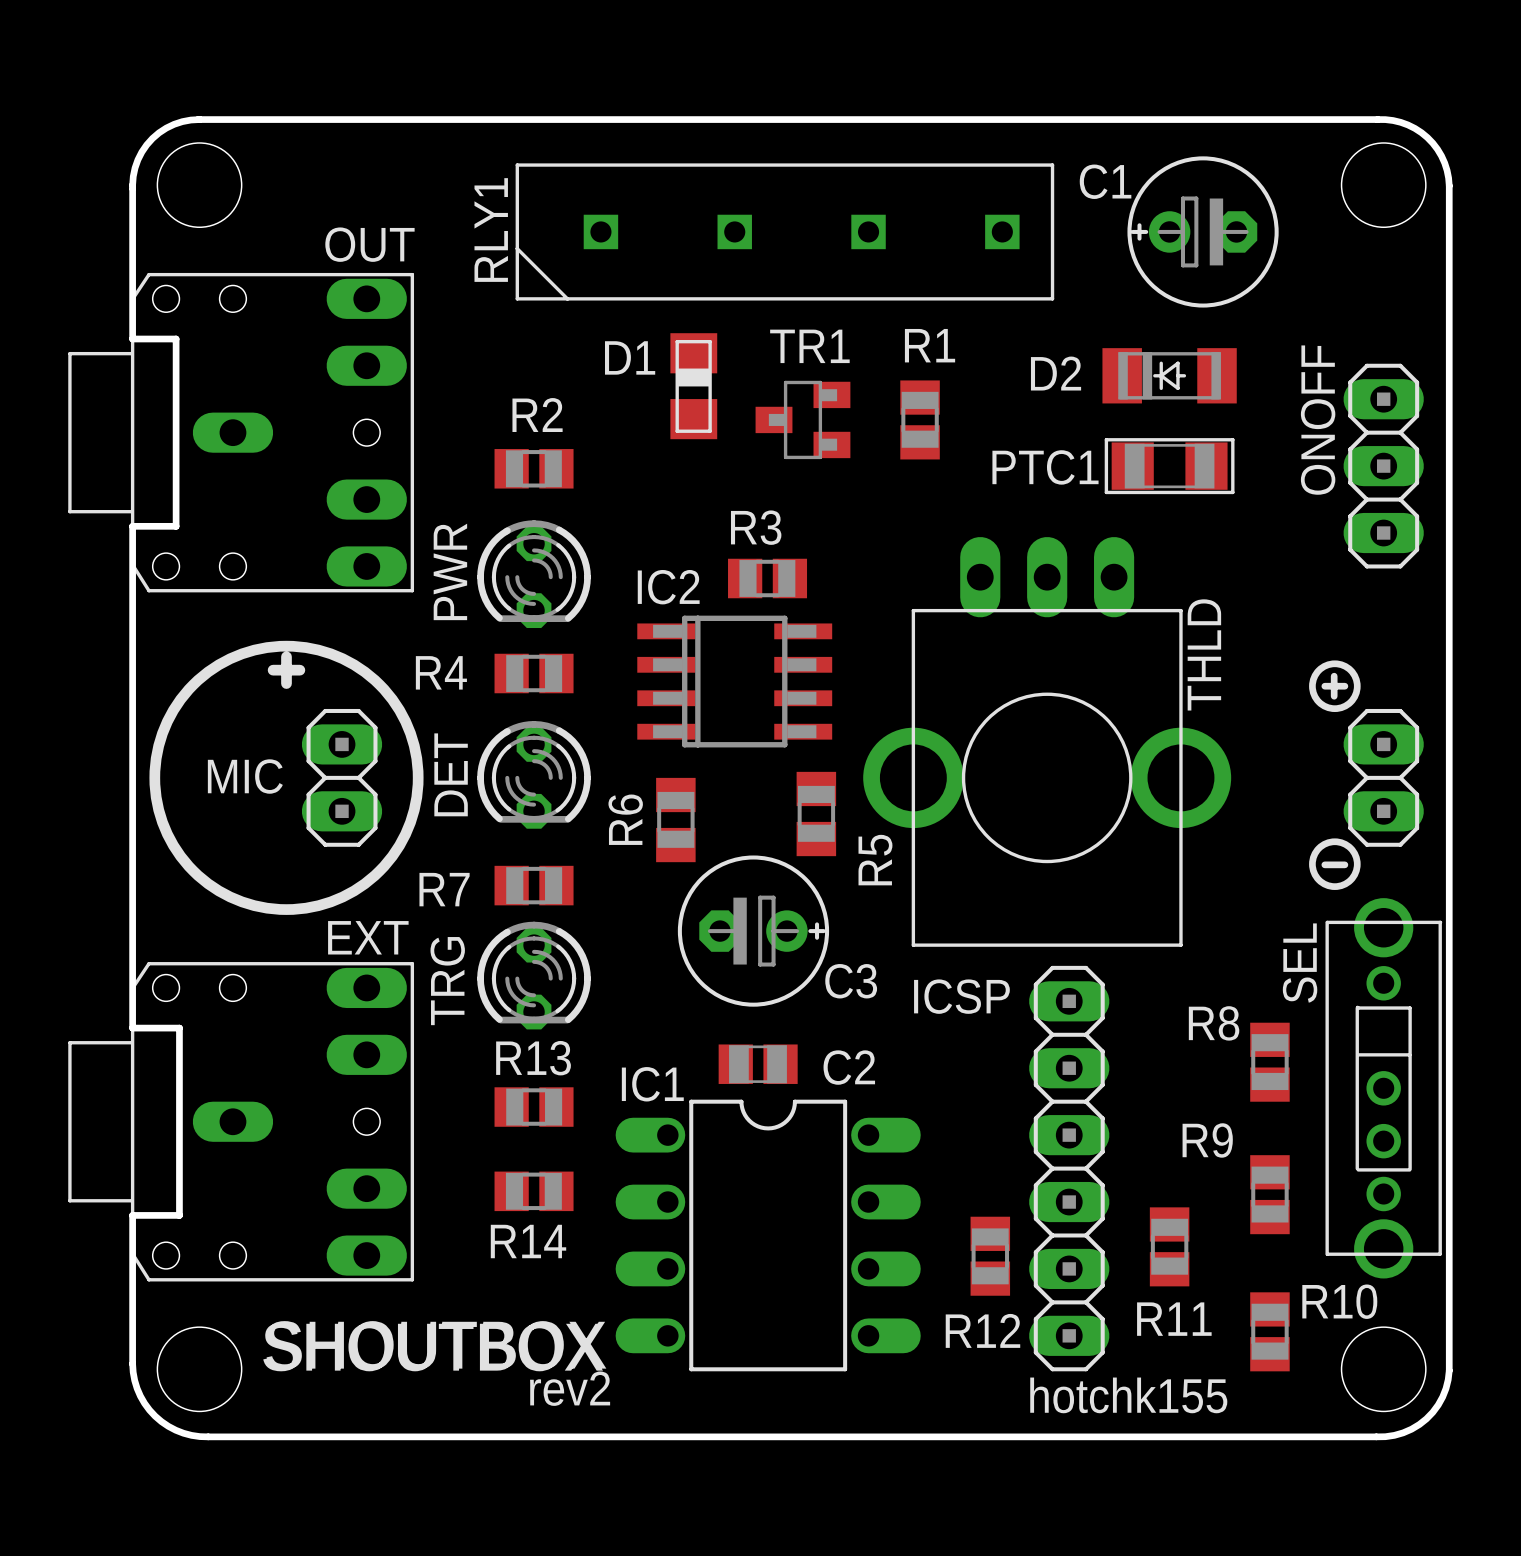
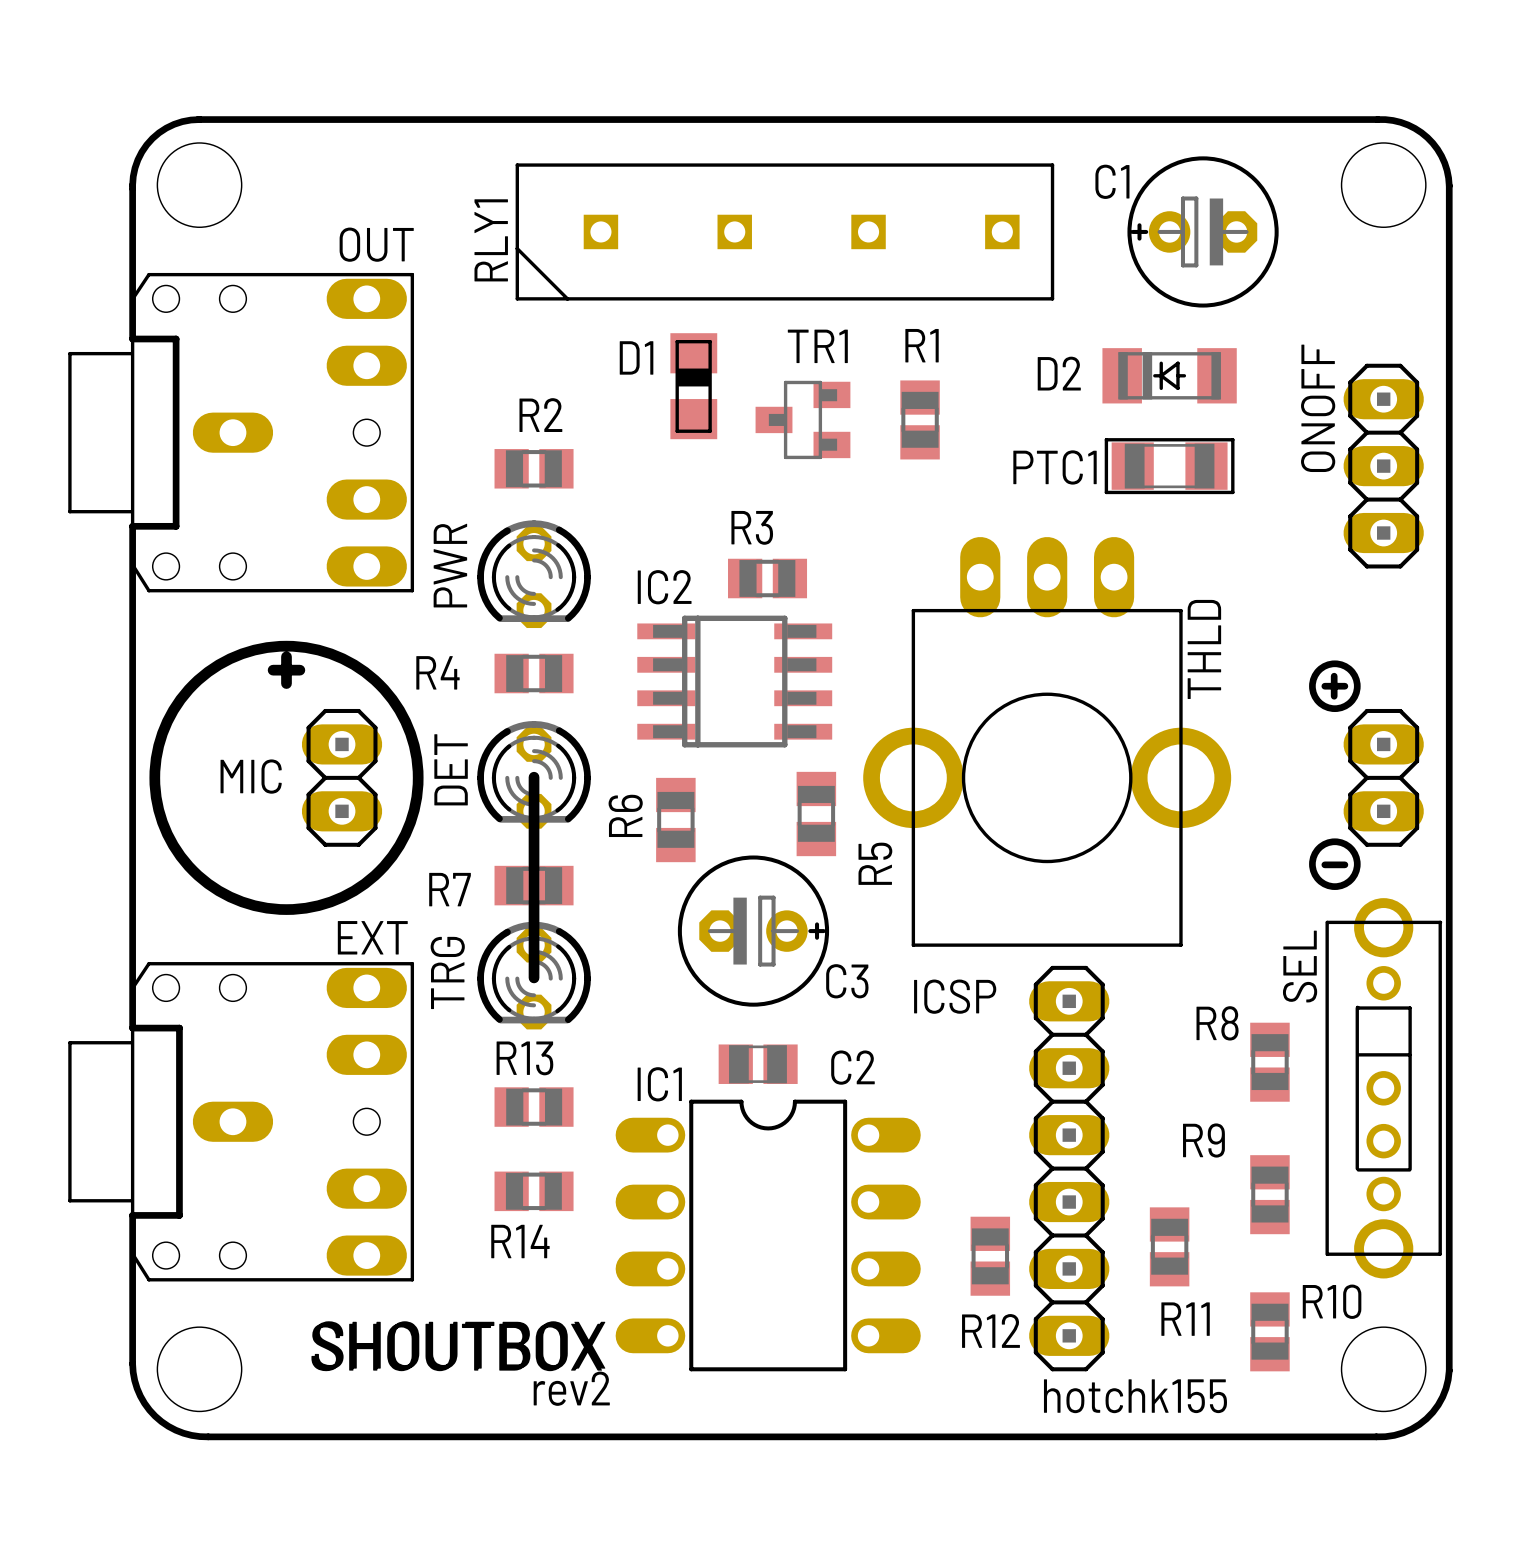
line: none -> (534, 777) (534, 977)

